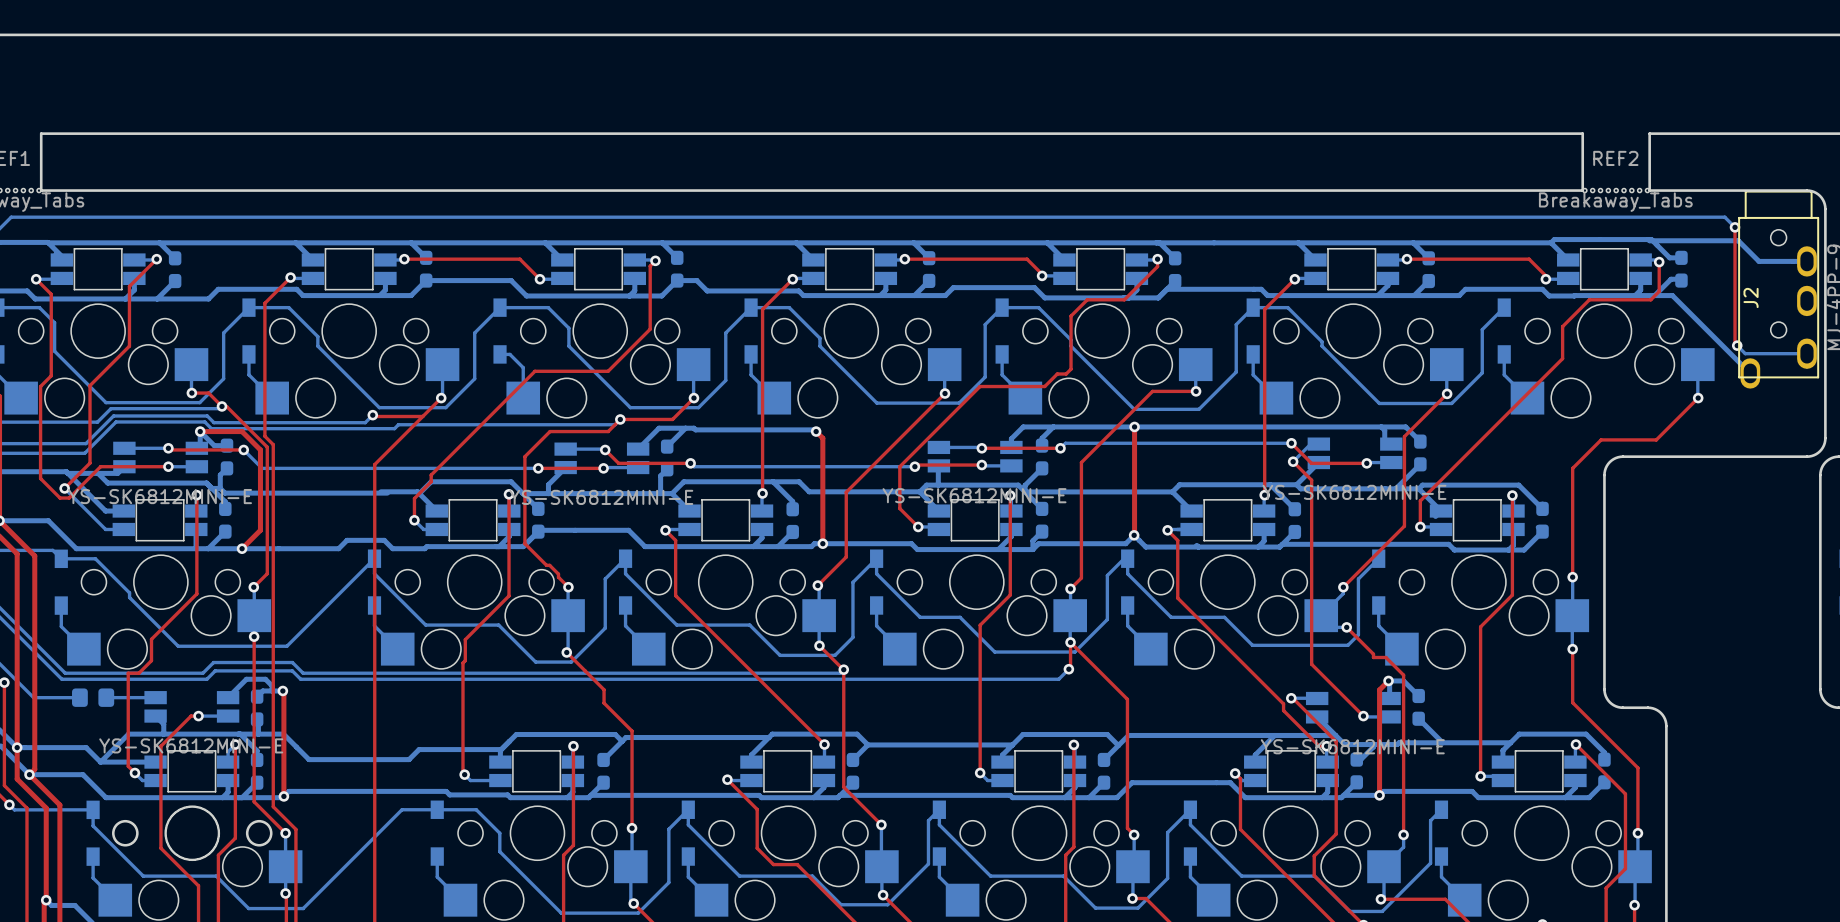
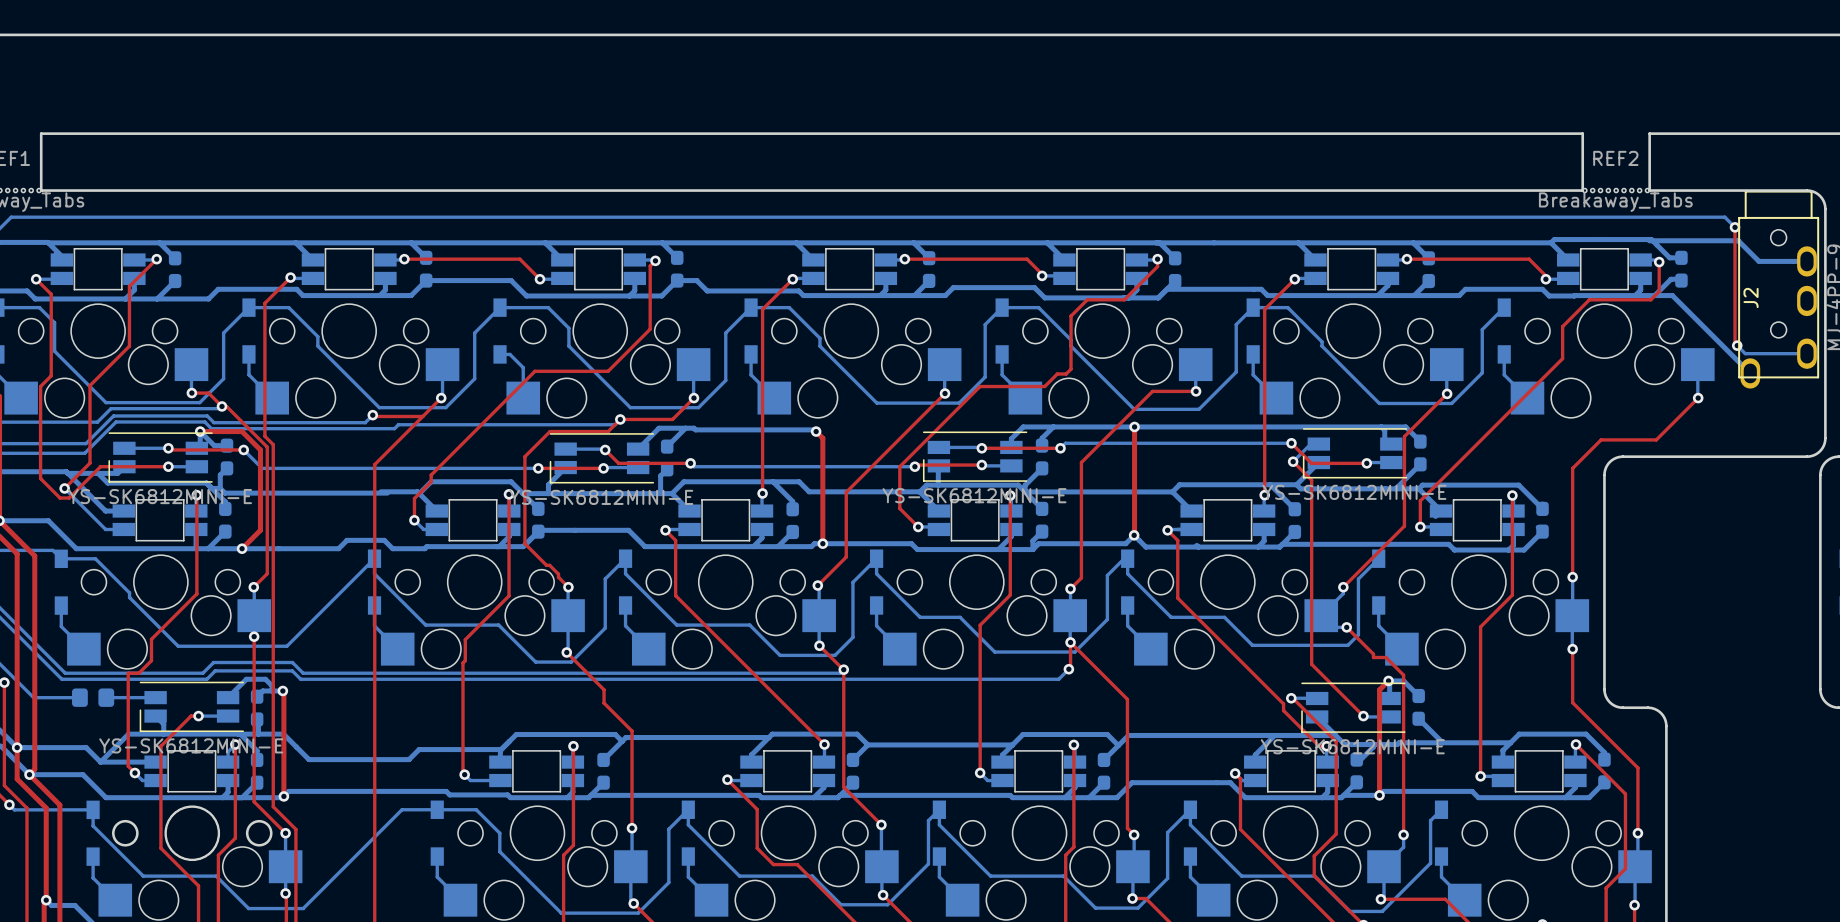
part footprint: [1307, 437, 1403, 470] -> [1302, 428, 1408, 479]
part footprint: [927, 440, 1023, 473] -> [922, 431, 1028, 482]
part footprint: [113, 441, 209, 474] -> [108, 432, 213, 483]
part footprint: [554, 442, 650, 475] -> [549, 433, 655, 484]
part footprint: [144, 691, 240, 723] -> [139, 681, 245, 733]
part footprint: [1305, 691, 1401, 724] -> [1301, 682, 1406, 733]

